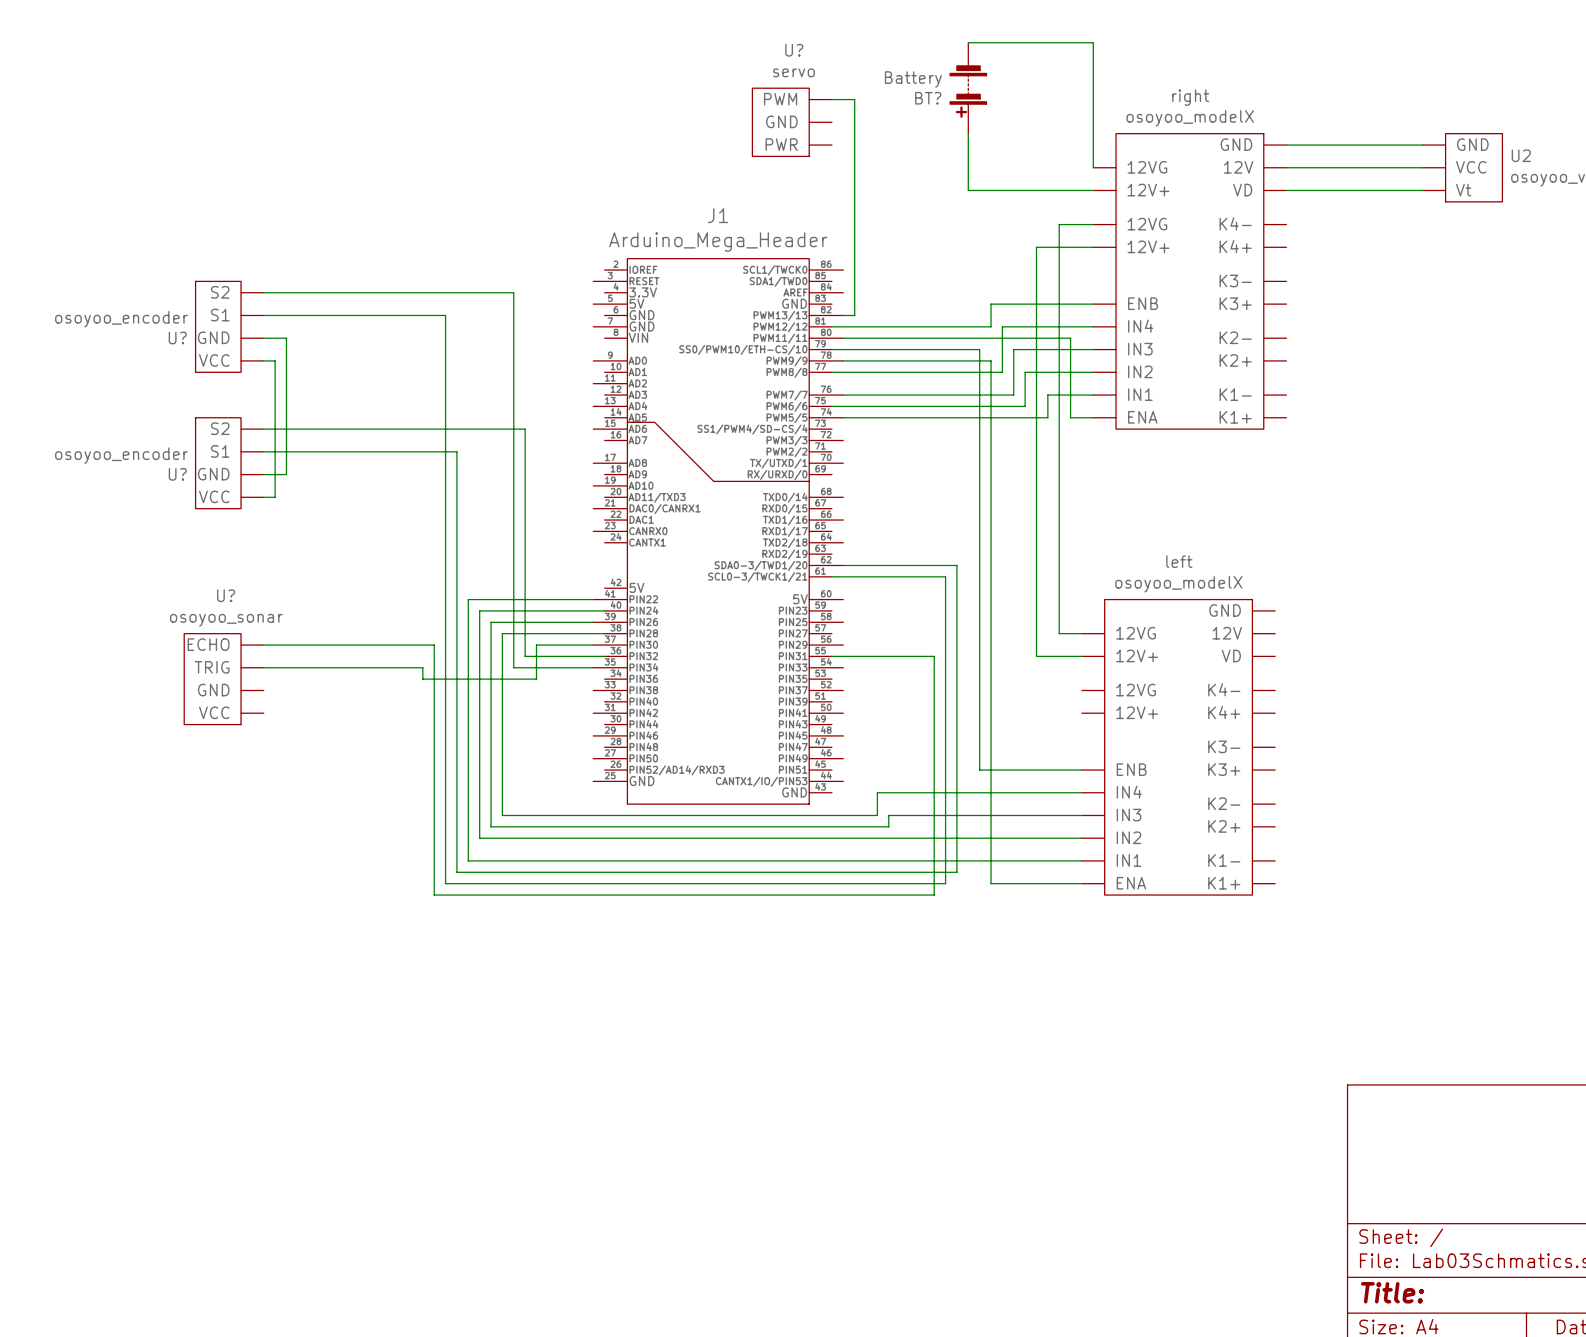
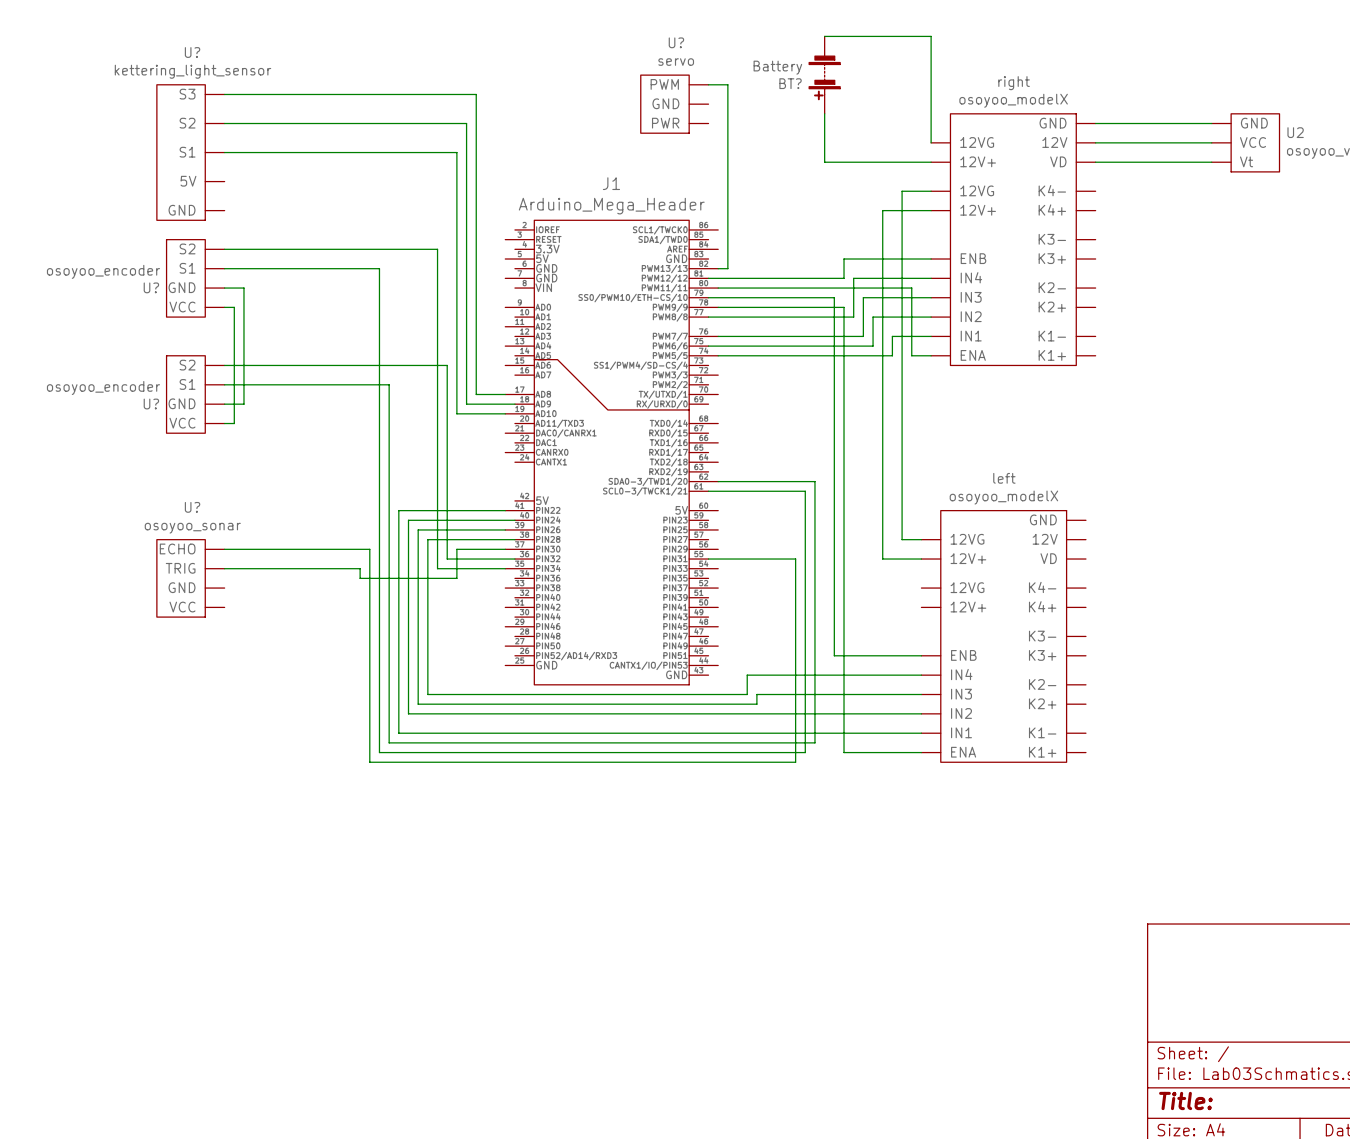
wire: none -> (224, 94) (476, 94) (476, 394) (505, 394)
wire: none -> (224, 123) (466, 123) (466, 404) (514, 404)
U?: none -> kettering_light_sensor (190, 152)
wire: none -> (224, 152) (456, 152) (456, 413) (505, 413)

